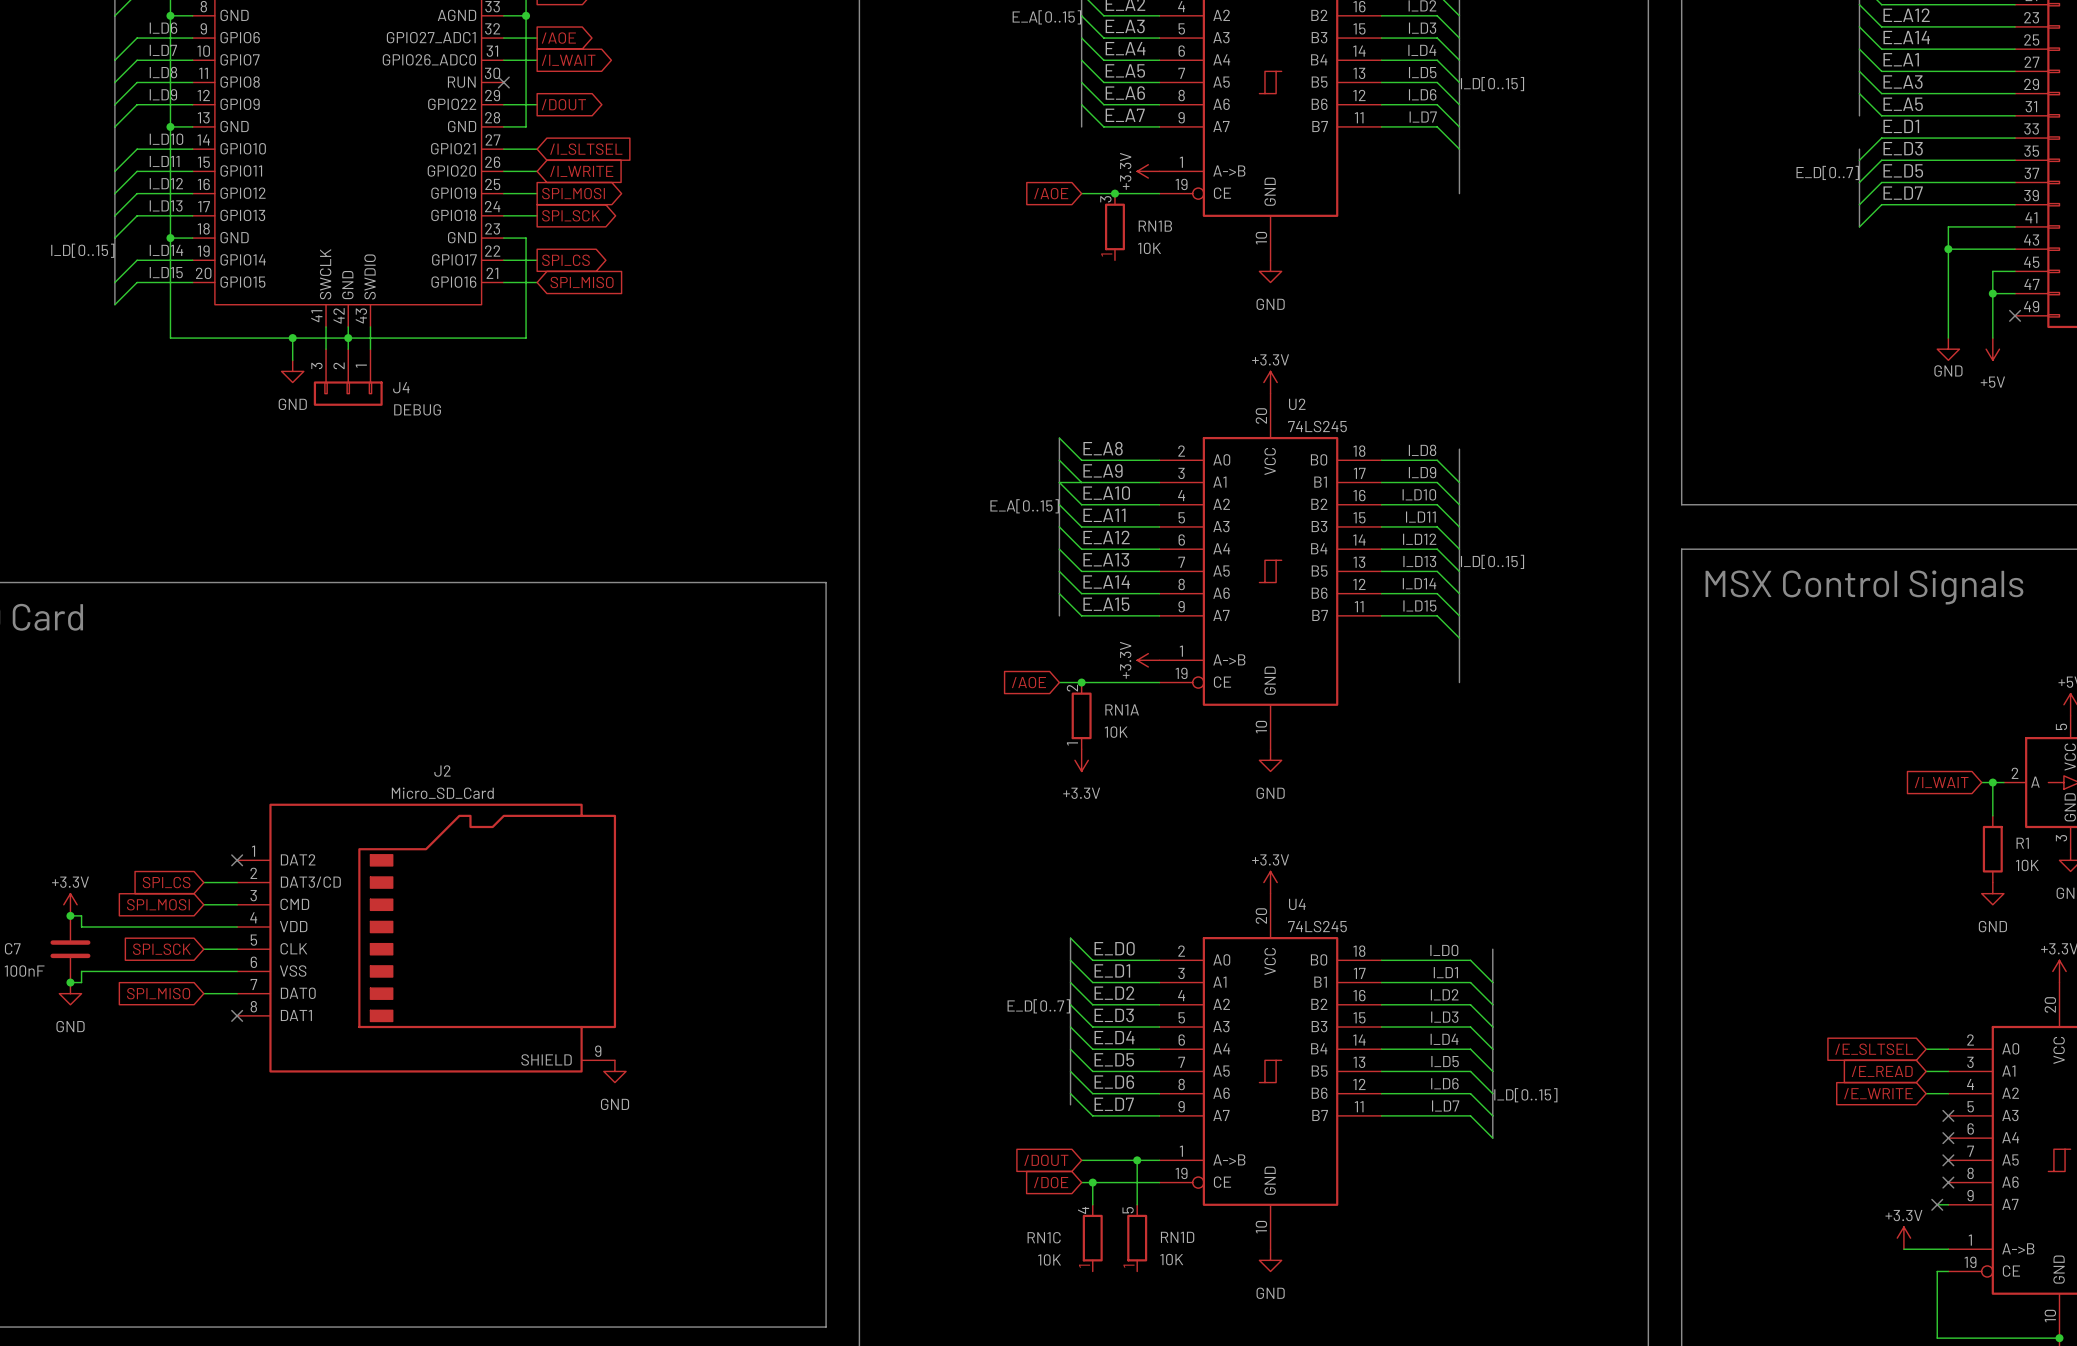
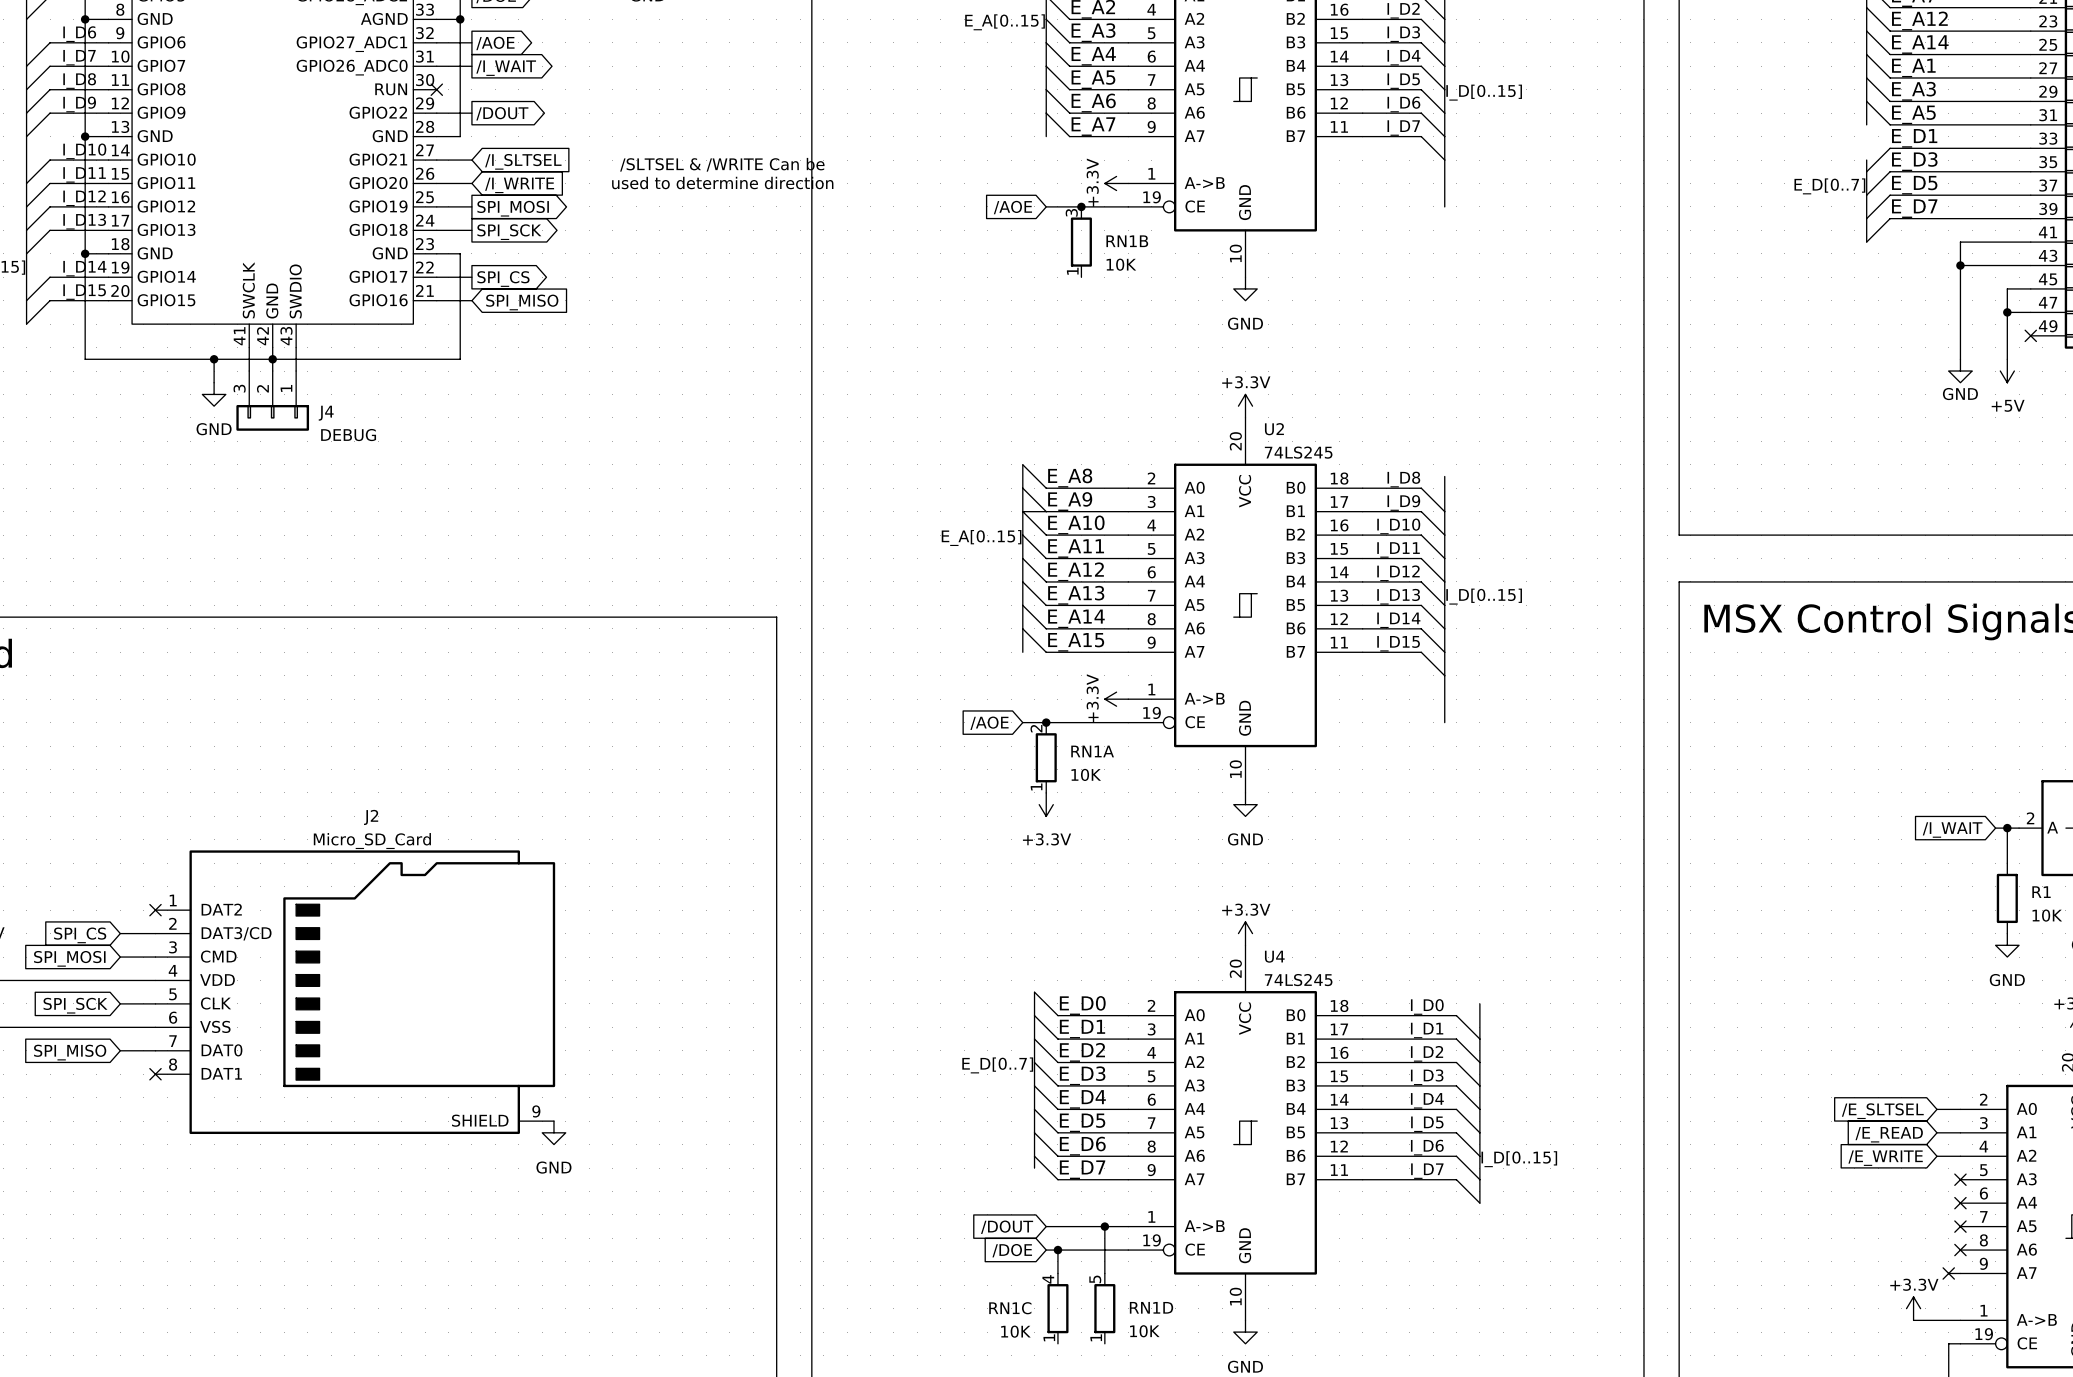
text: none -> /SLTSEL & /WRITE Can be (722, 164)
text: none -> used to determine direction (722, 183)

